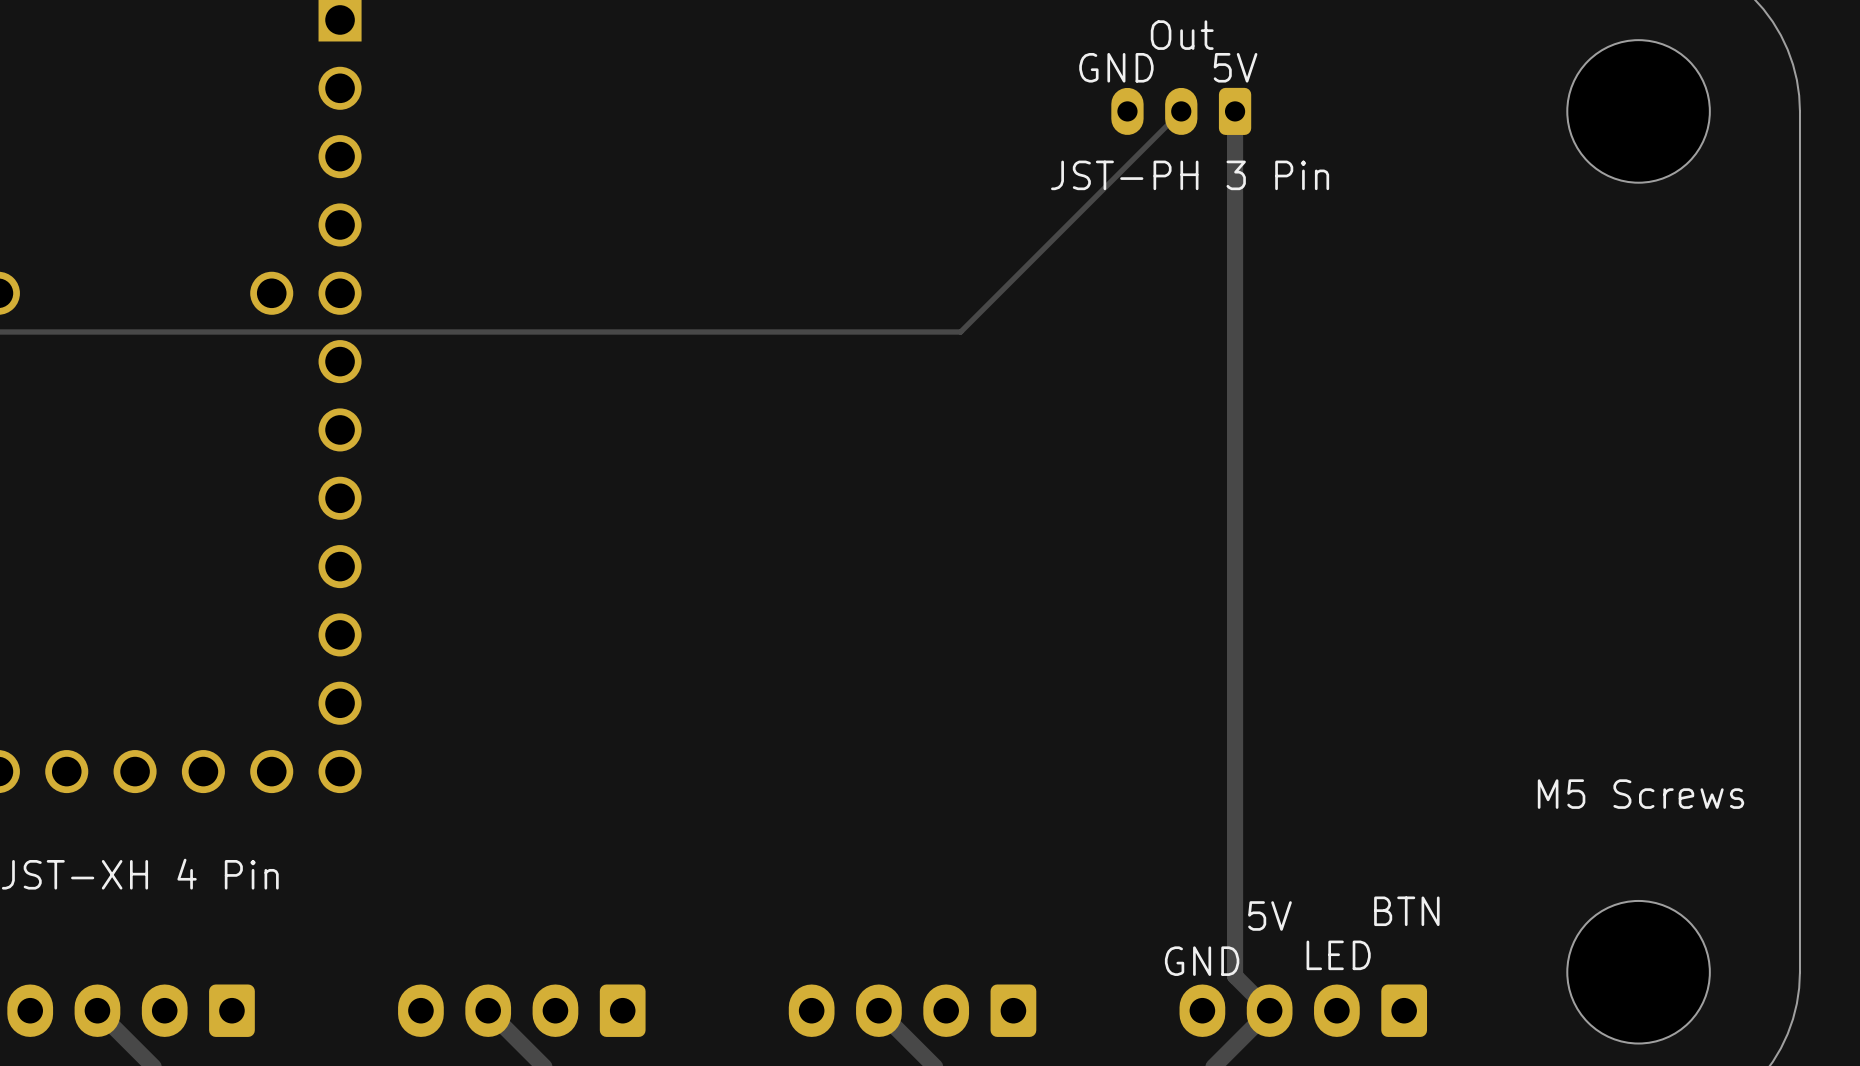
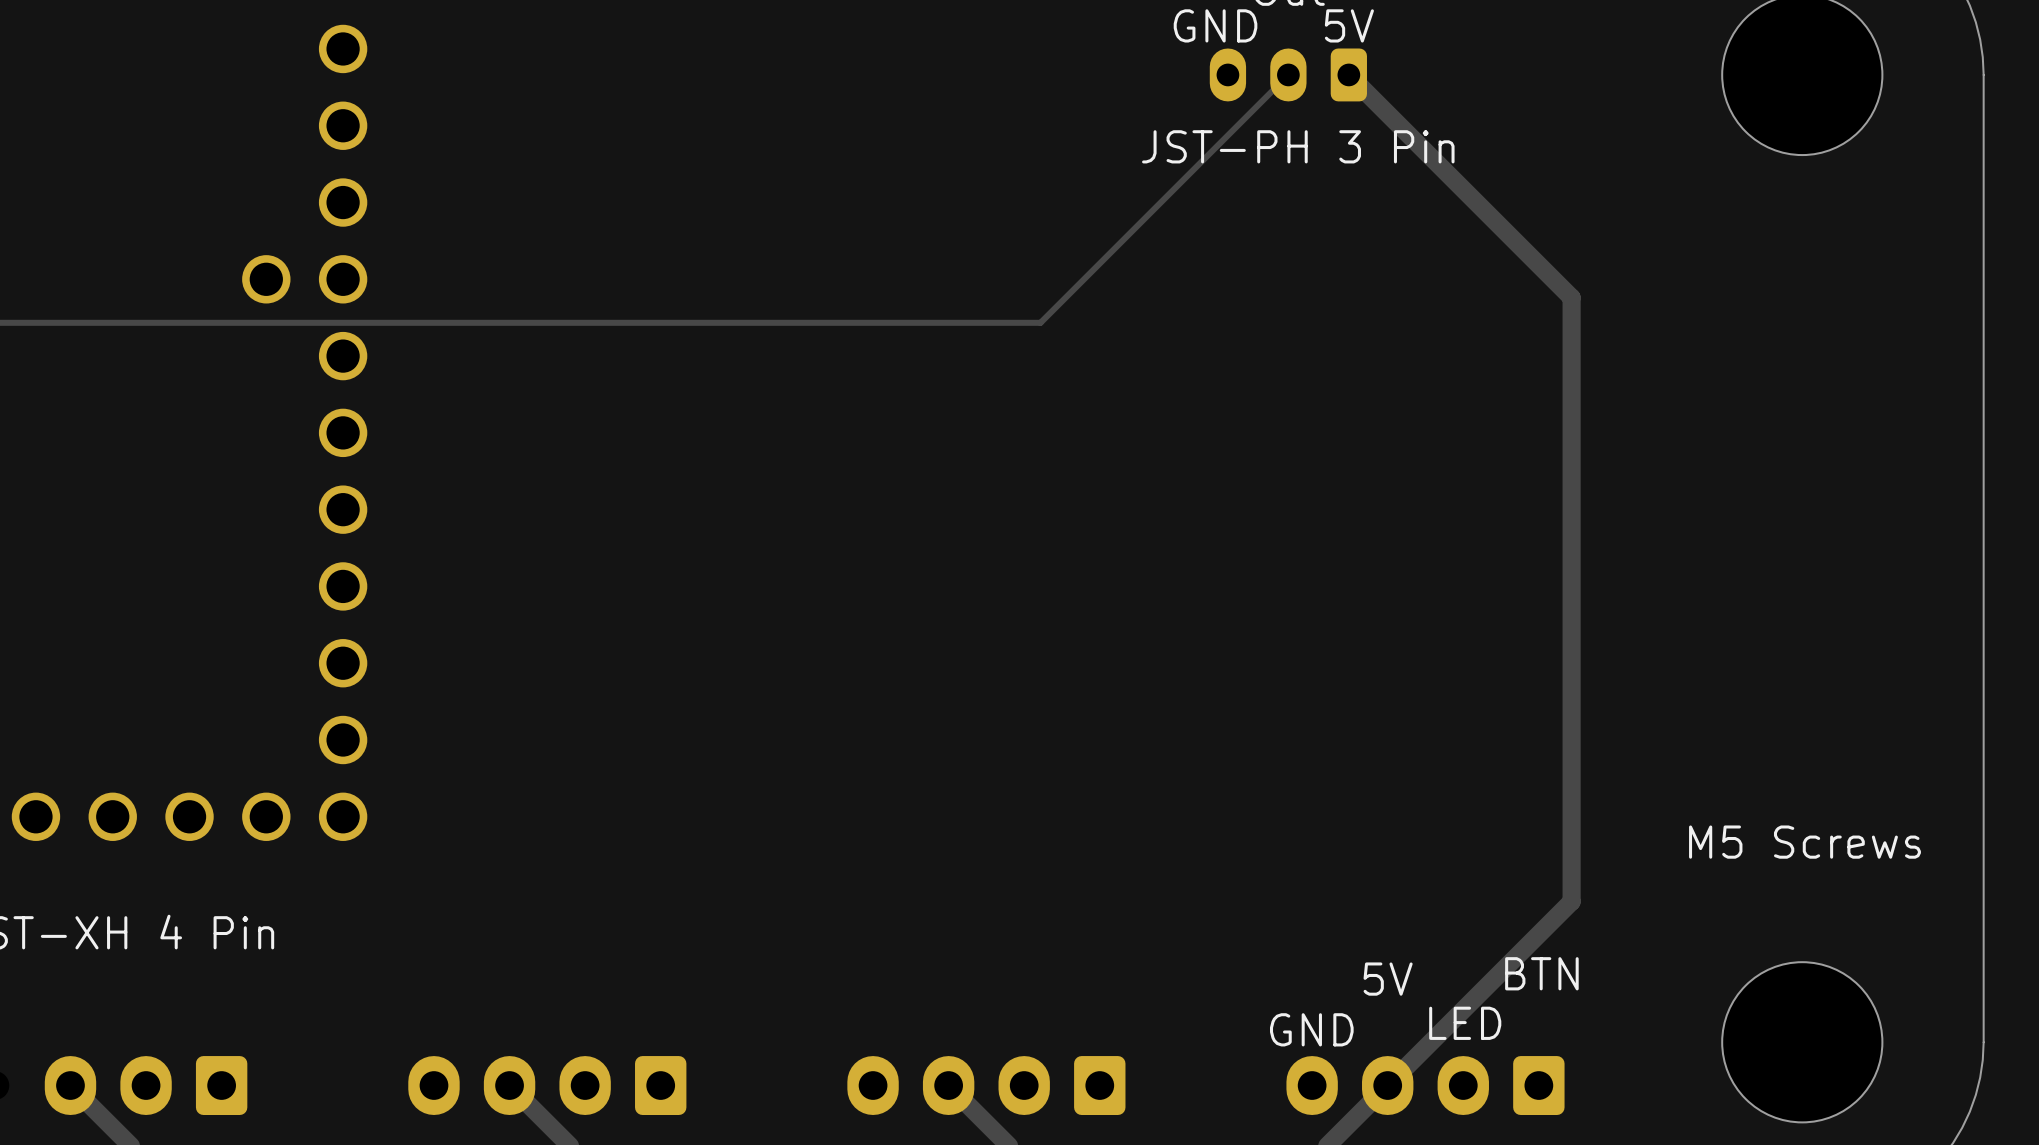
track: (1235, 111) (1235, 976) (1269, 1010) -> (1348, 74) (1571, 297) (1571, 901) (1387, 1085)

